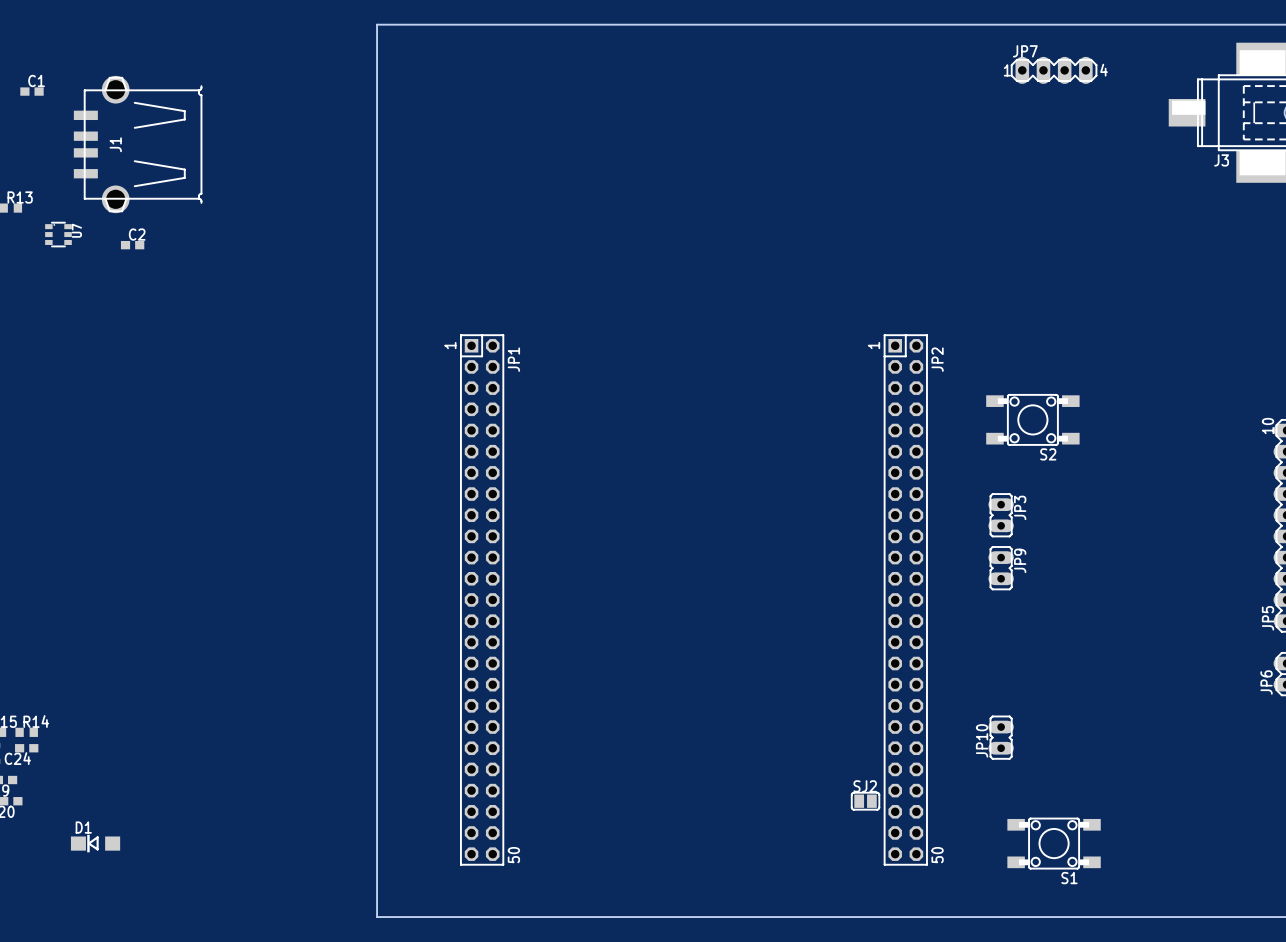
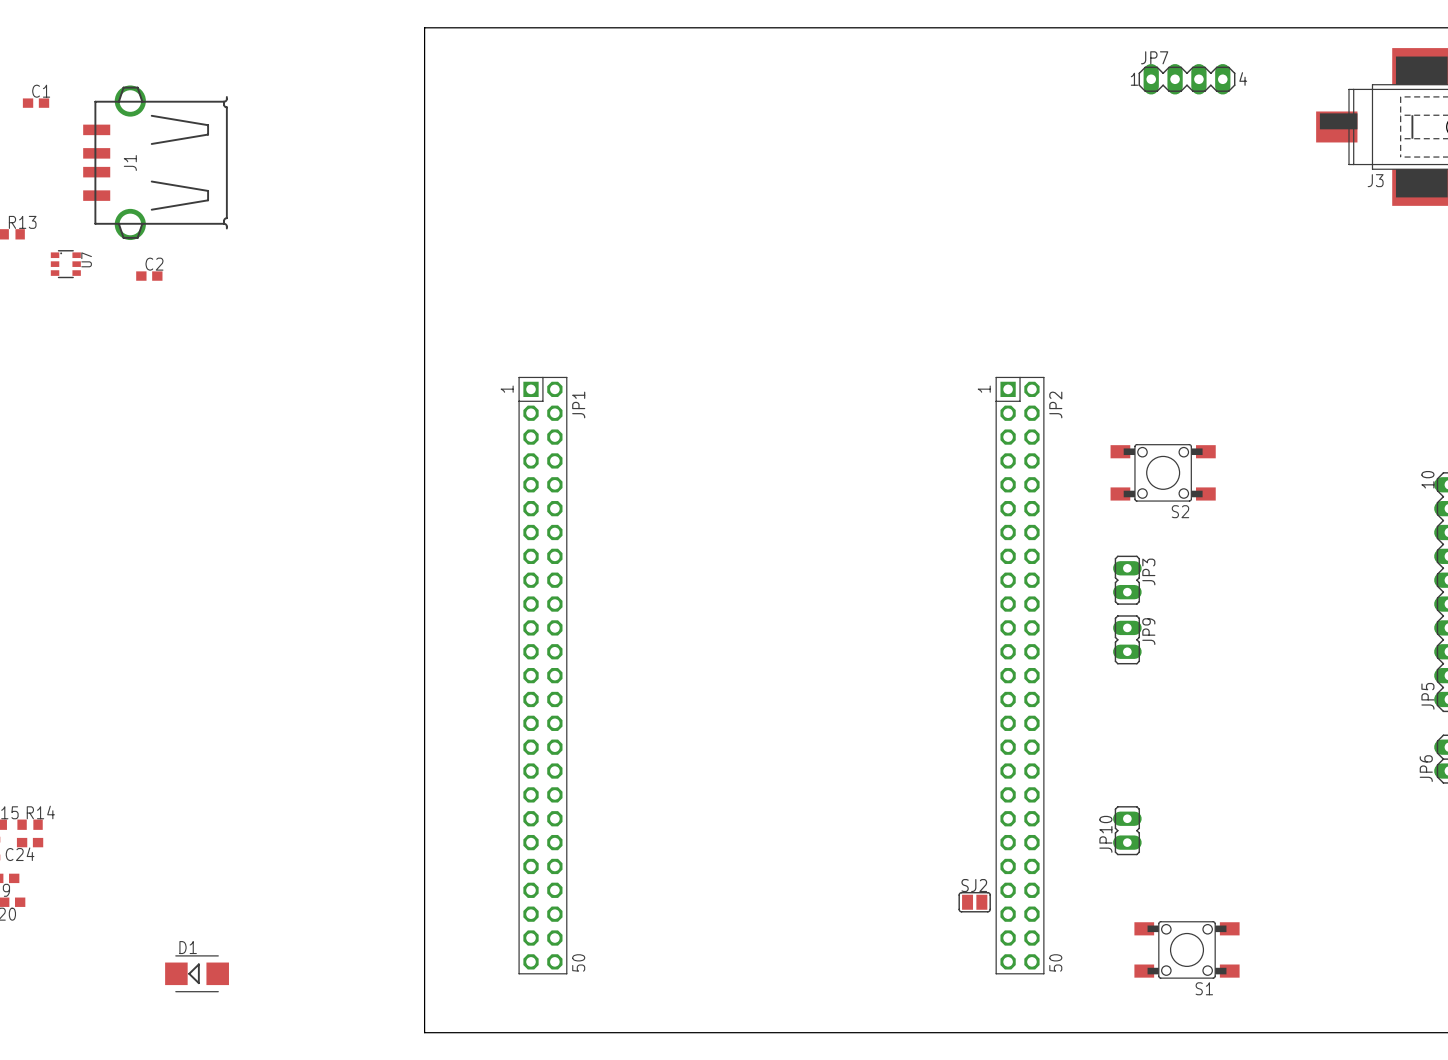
D1 footprint: [70, 834, 121, 853] -> [165, 955, 229, 993]

